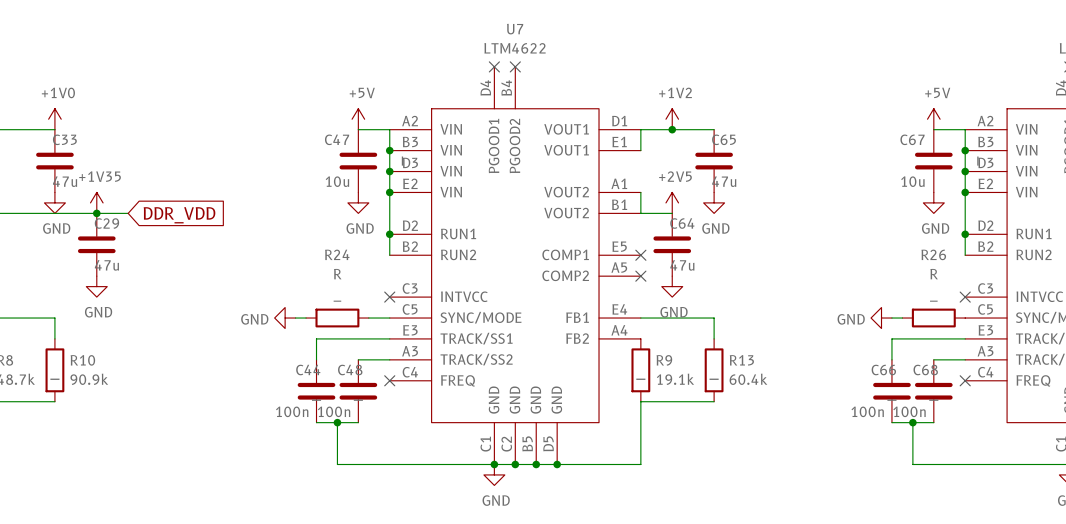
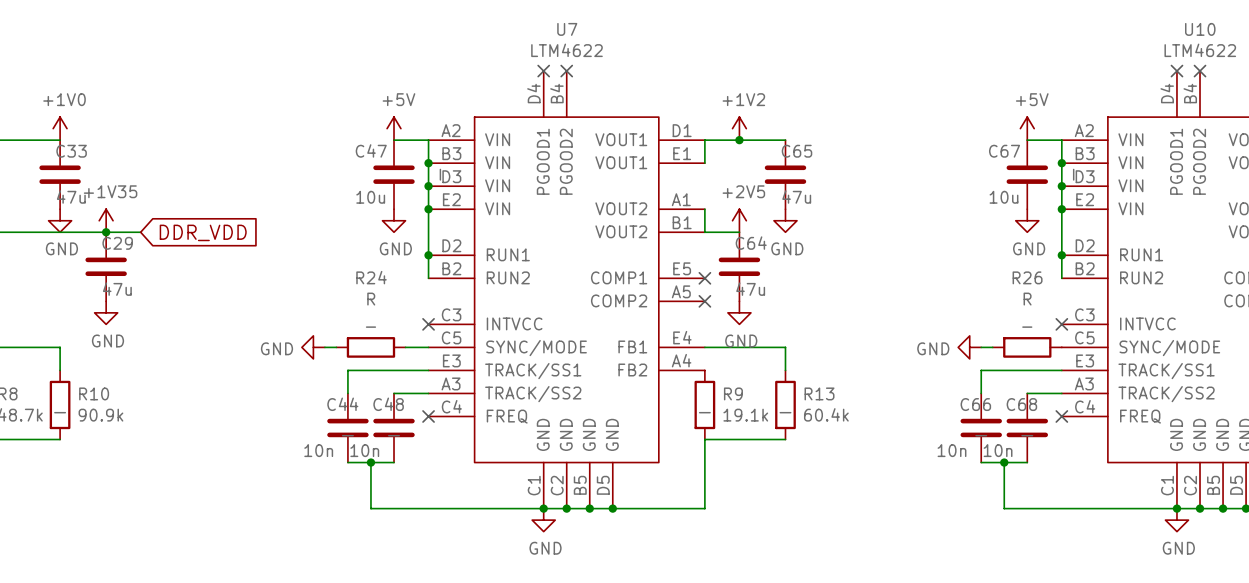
C44 value: 100n (292, 411) -> 10n (318, 450)
C48 value: 100n (334, 411) -> 10n (364, 450)
C66 value: 100n (867, 411) -> 10n (951, 450)
C68 value: 100n (909, 411) -> 10n (998, 450)

